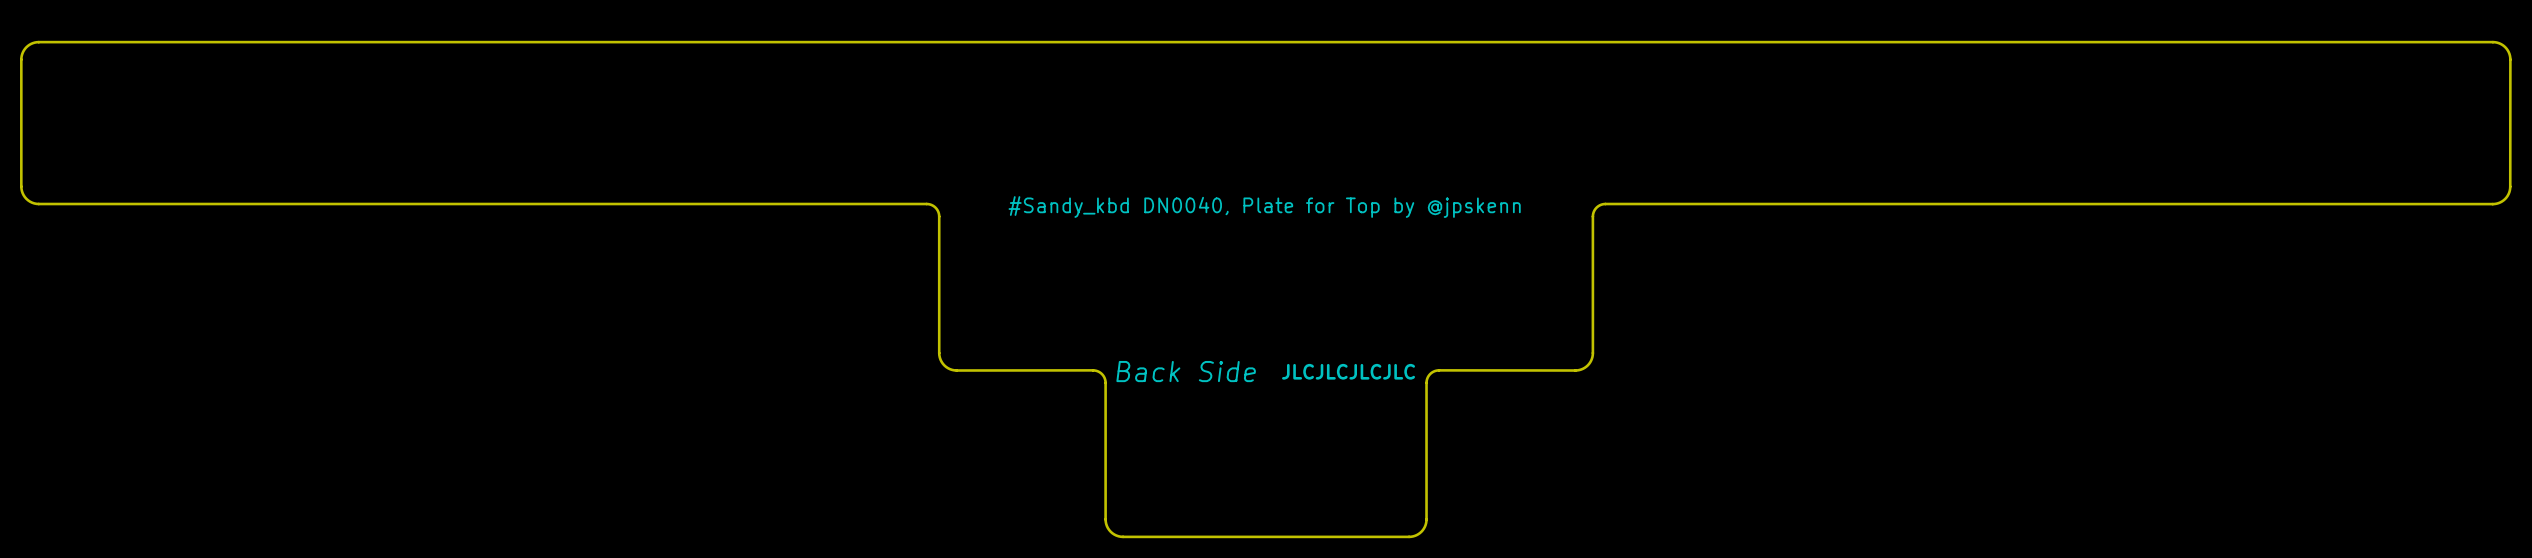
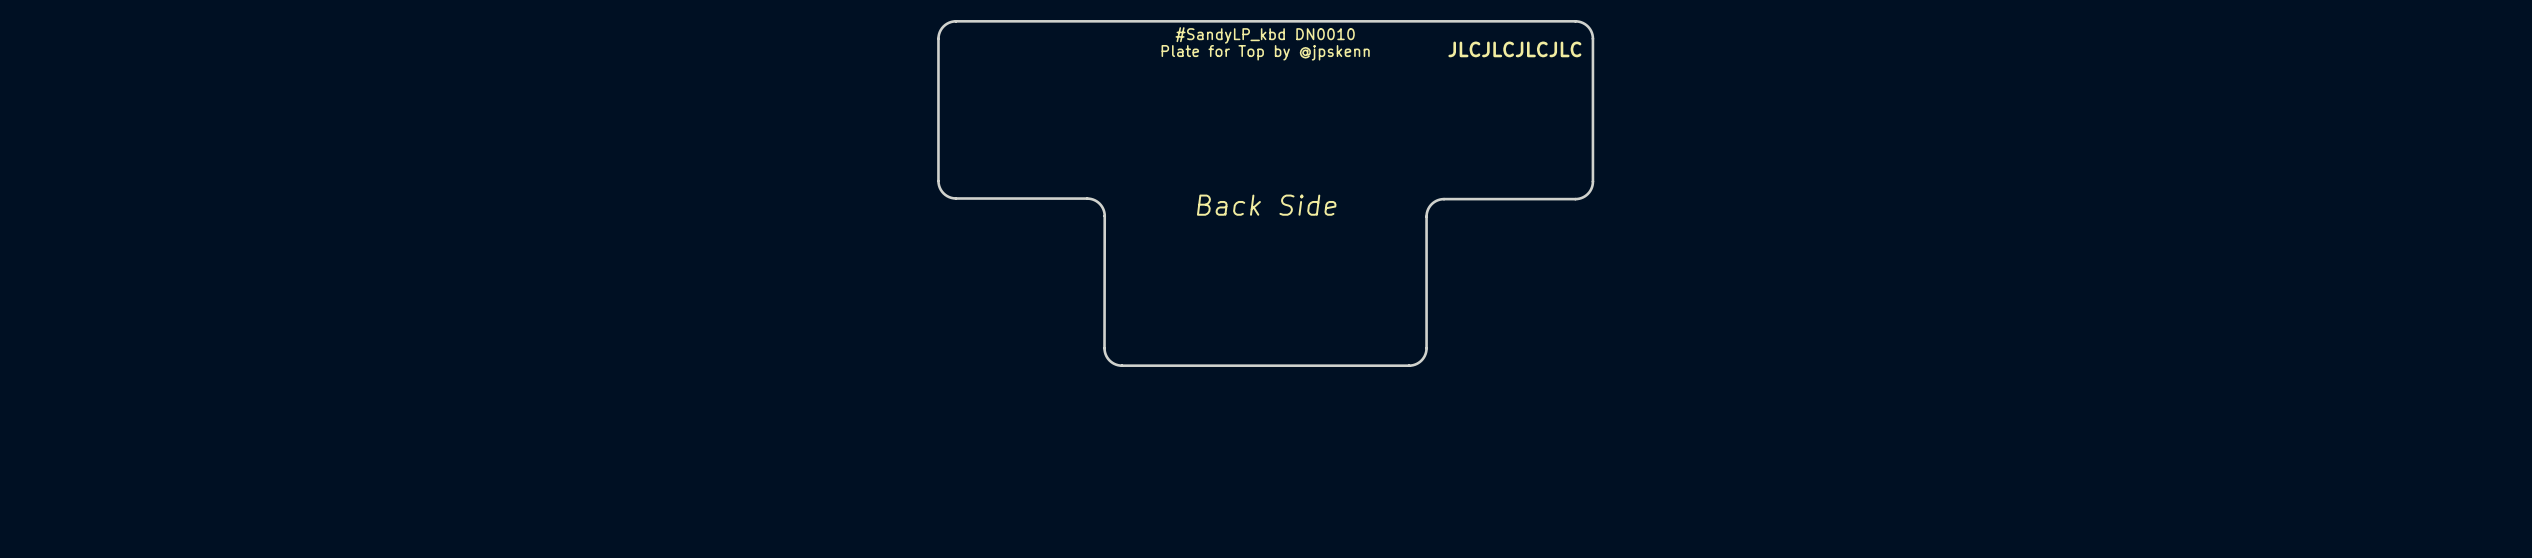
drawing: none -> [937, 20, 1595, 367]
text: none -> #SandyLP_kbd DN0010 (1265, 35)
drawing: [20, 40, 2512, 539] -> none
text: none -> JLCJLCJLCJLC (1514, 49)
text: none -> Plate for Top by @jpskenn (1265, 52)
text: #Sandy_kbd DN0040, Plate for Top by @jpskenn (1264, 207) -> Back Side (1266, 205)
text: Back Side (1186, 371) -> none
text: JLCJLCJLCJLC (1348, 371) -> none

